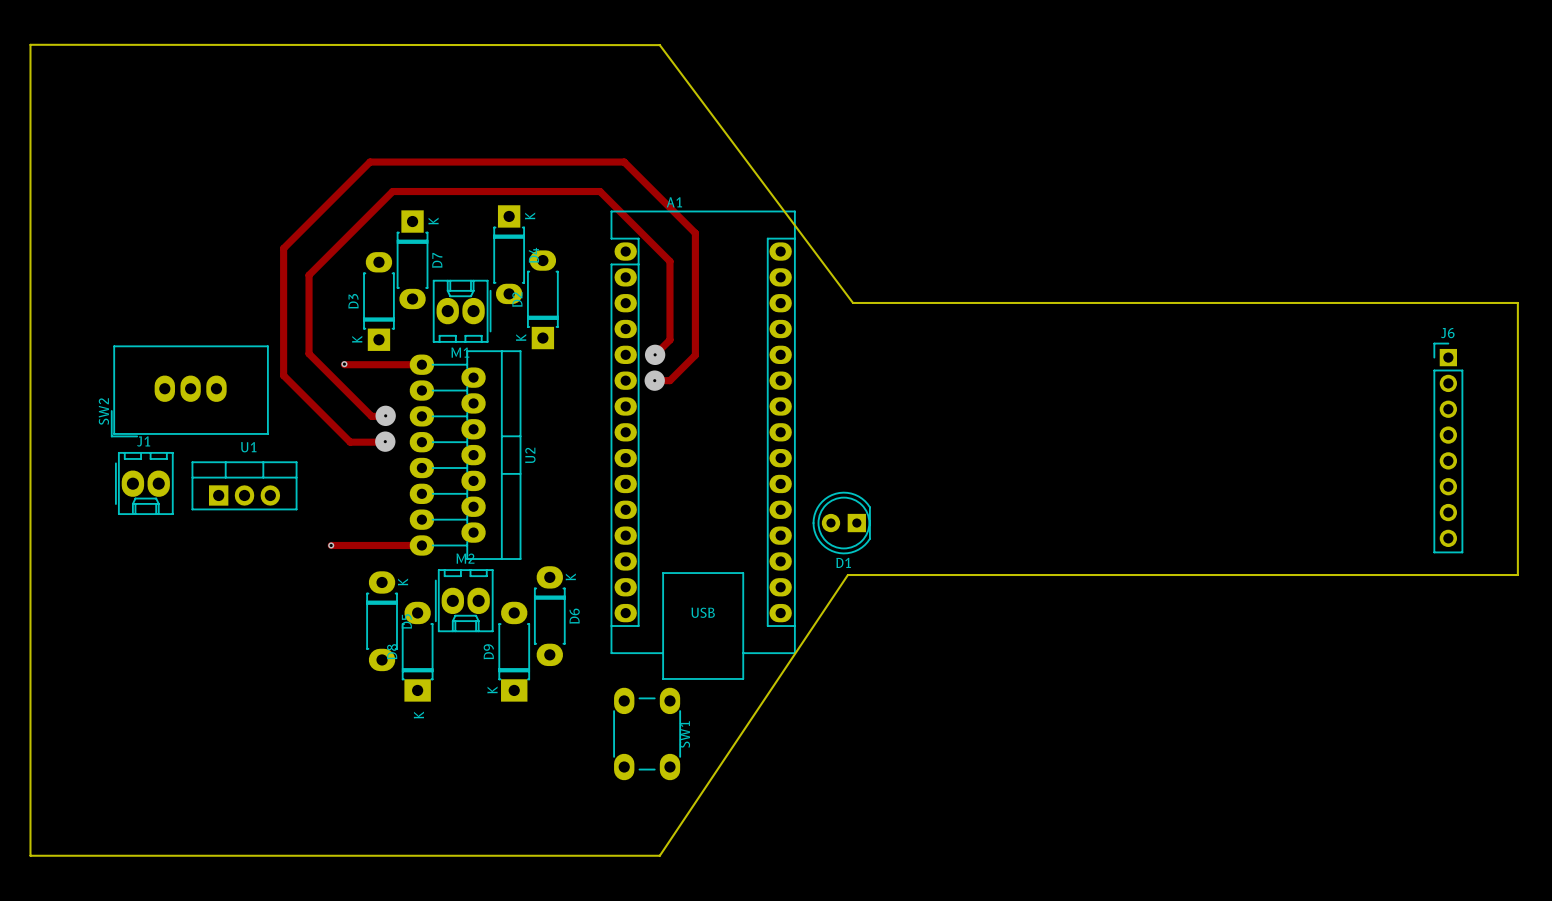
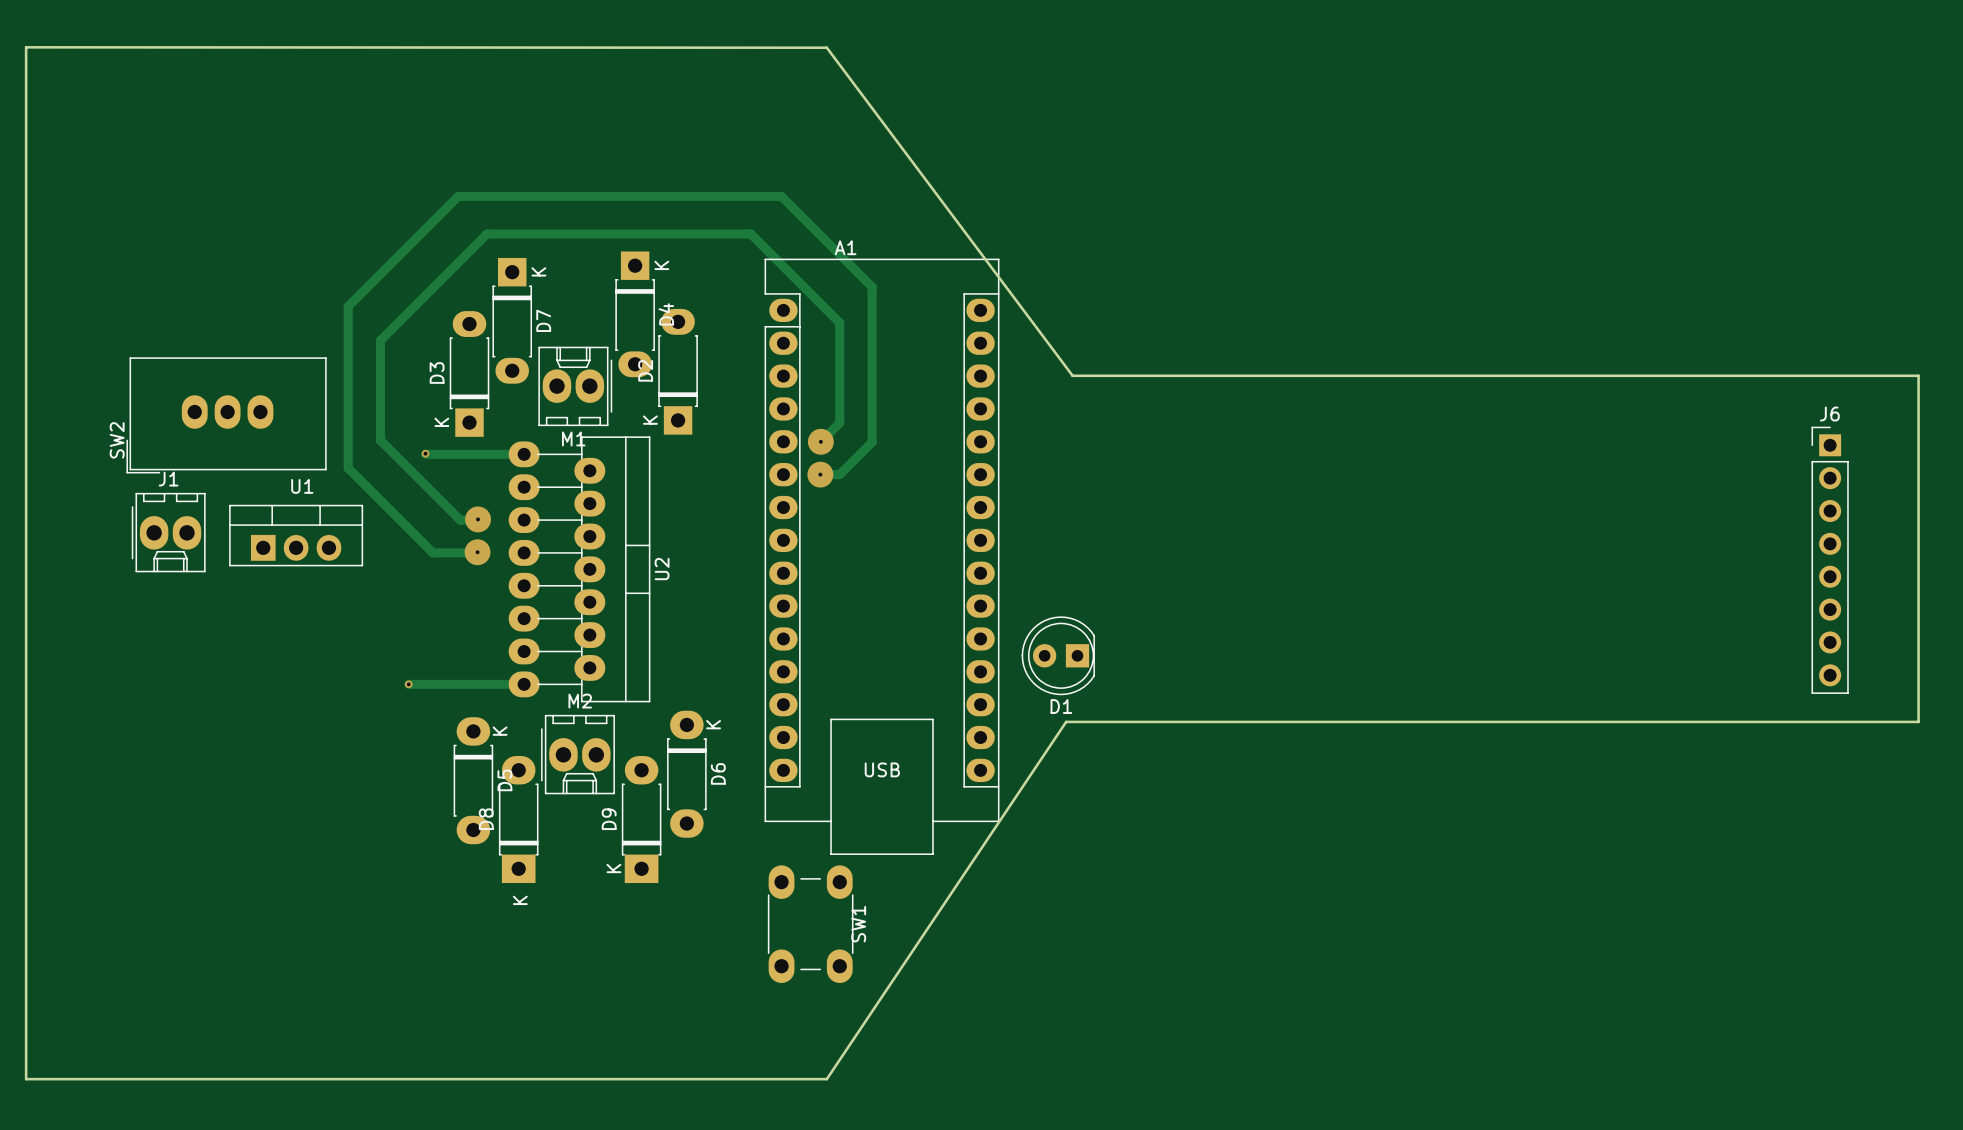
SW2 position: (189, 391) -> (226, 415)
J1 position: (144, 483) -> (168, 532)
U1 position: (244, 485) -> (296, 535)

